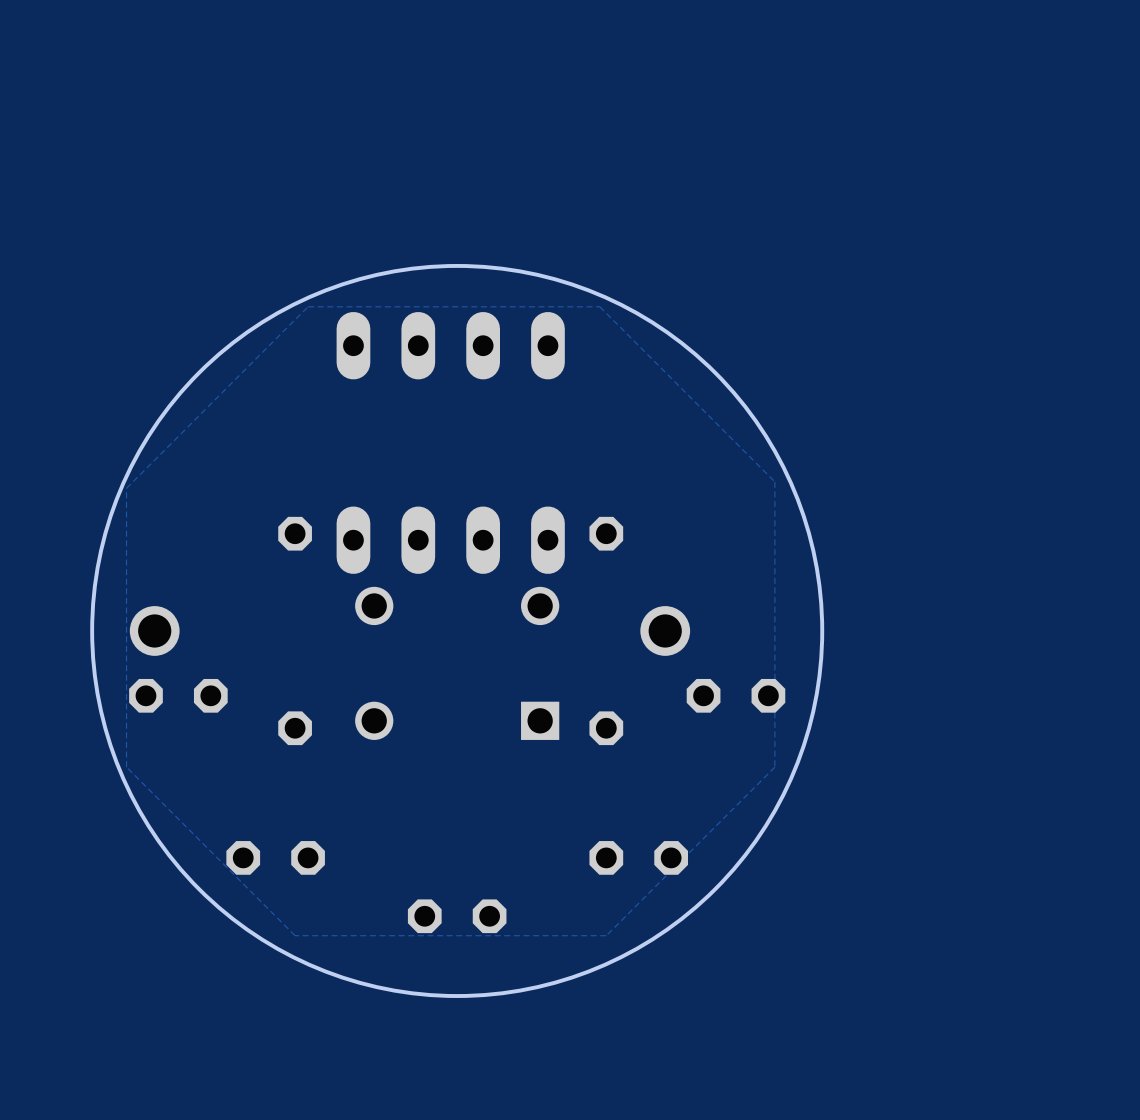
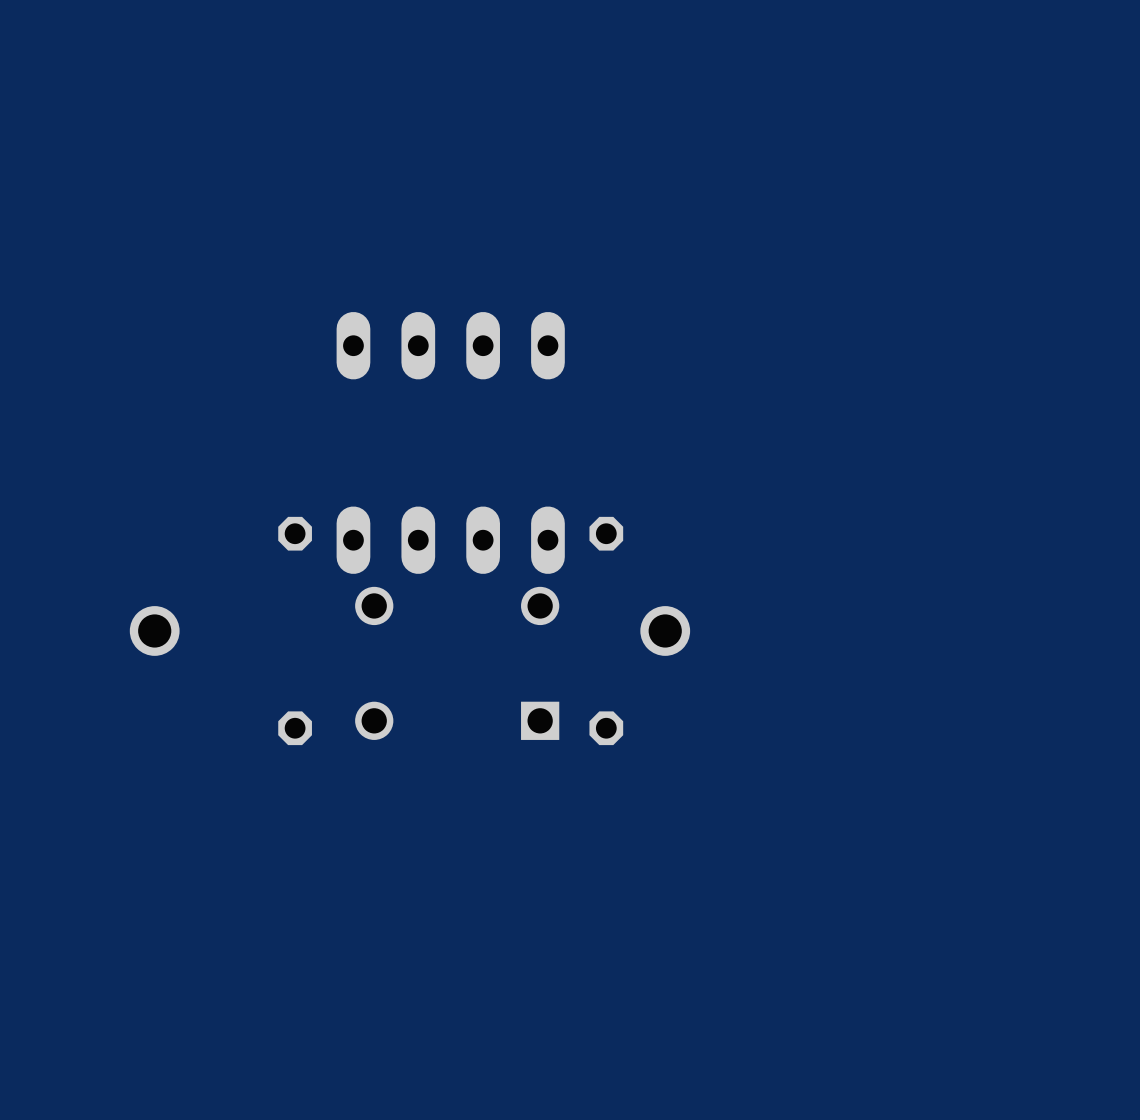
round board edge: [90, 263, 825, 998] -> none
zone outline: (599, 306) (308, 306) (126, 488) (126, 767) (295, 935) (606, 935) (774, 767) (774, 481) (599, 306) -> none
part: (178, 695) -> none
part: (735, 695) -> none
part: (275, 857) -> none
part: (638, 857) -> none
part: (457, 916) -> none

